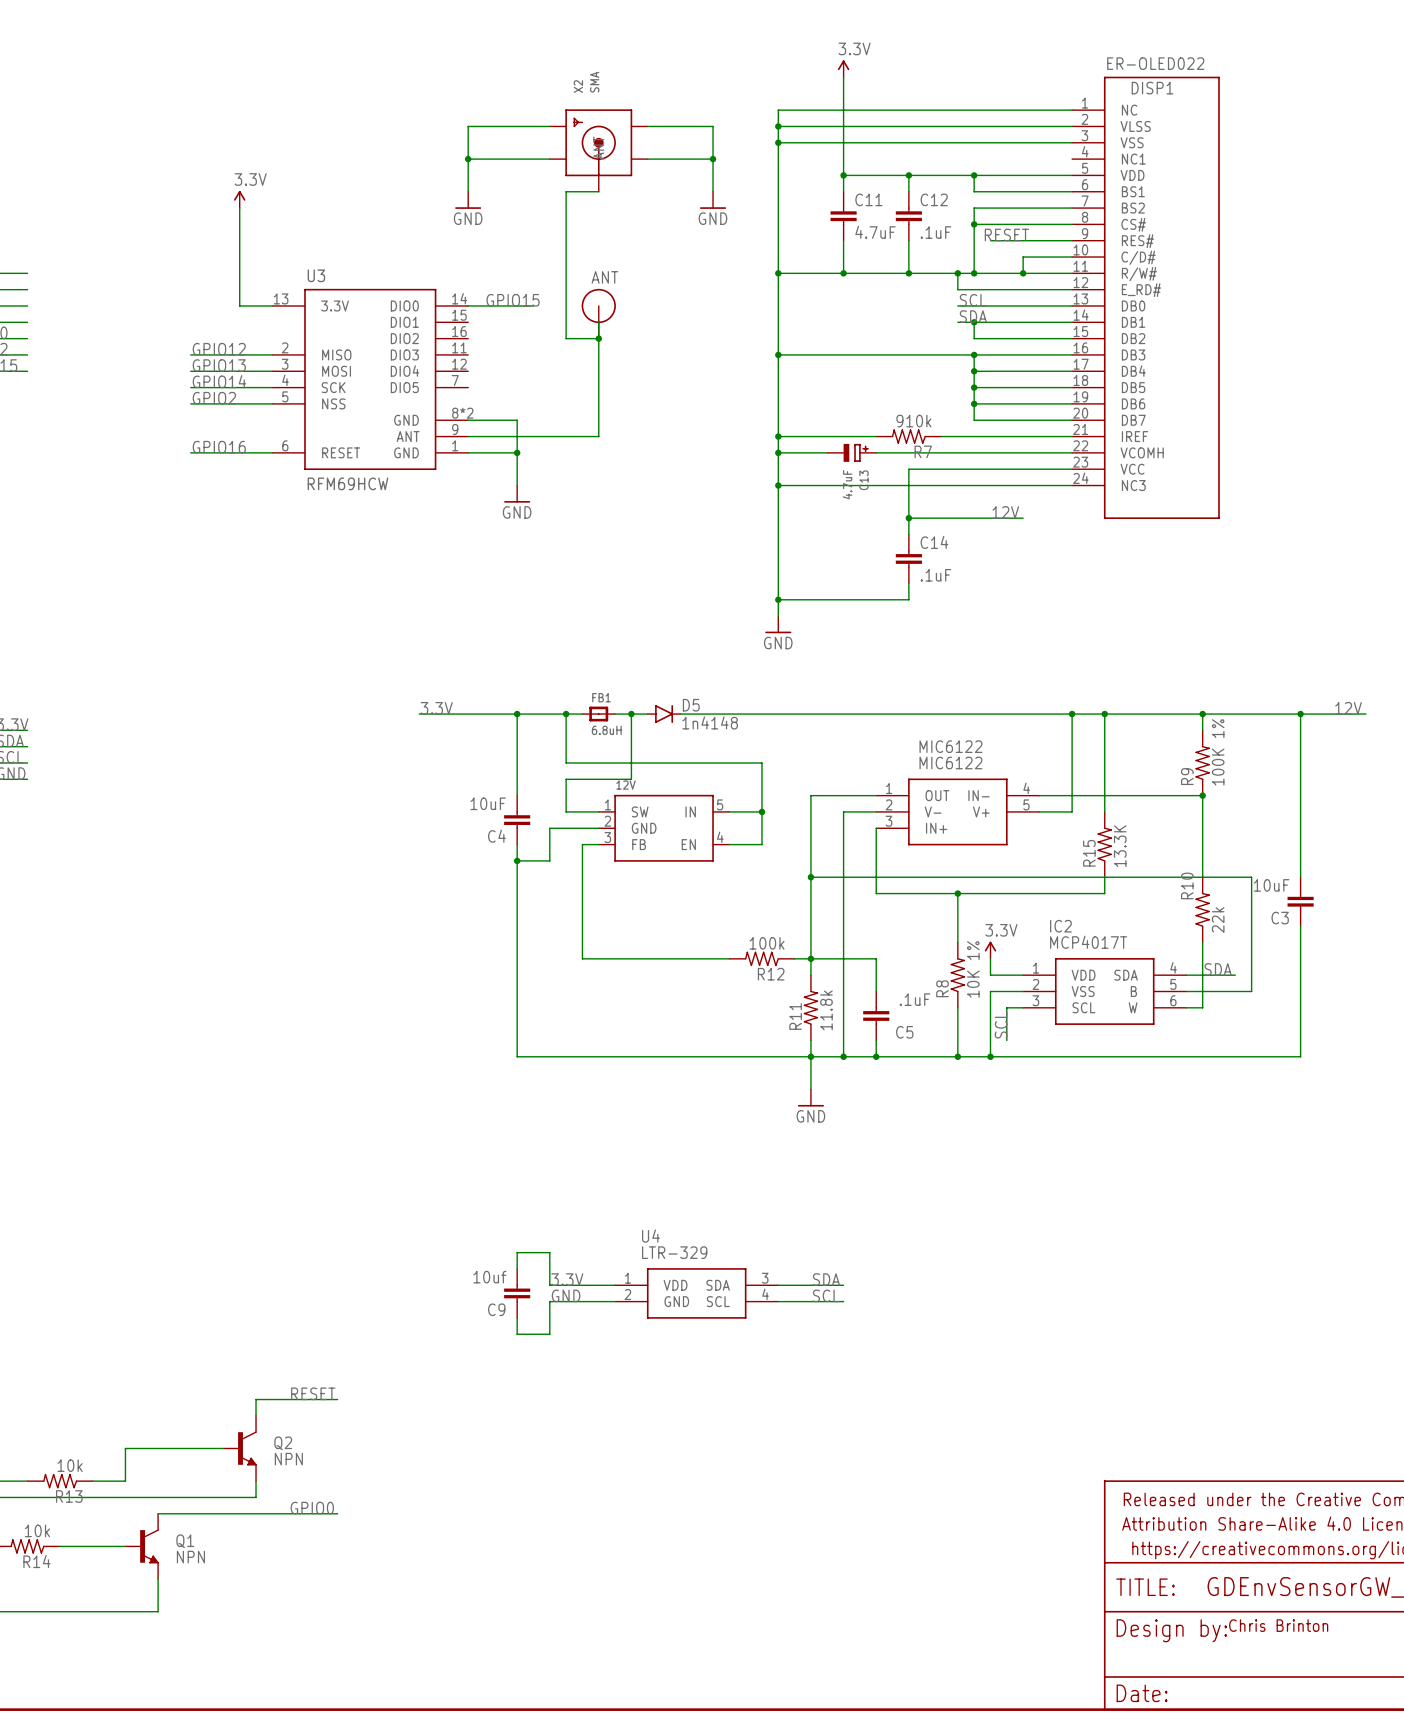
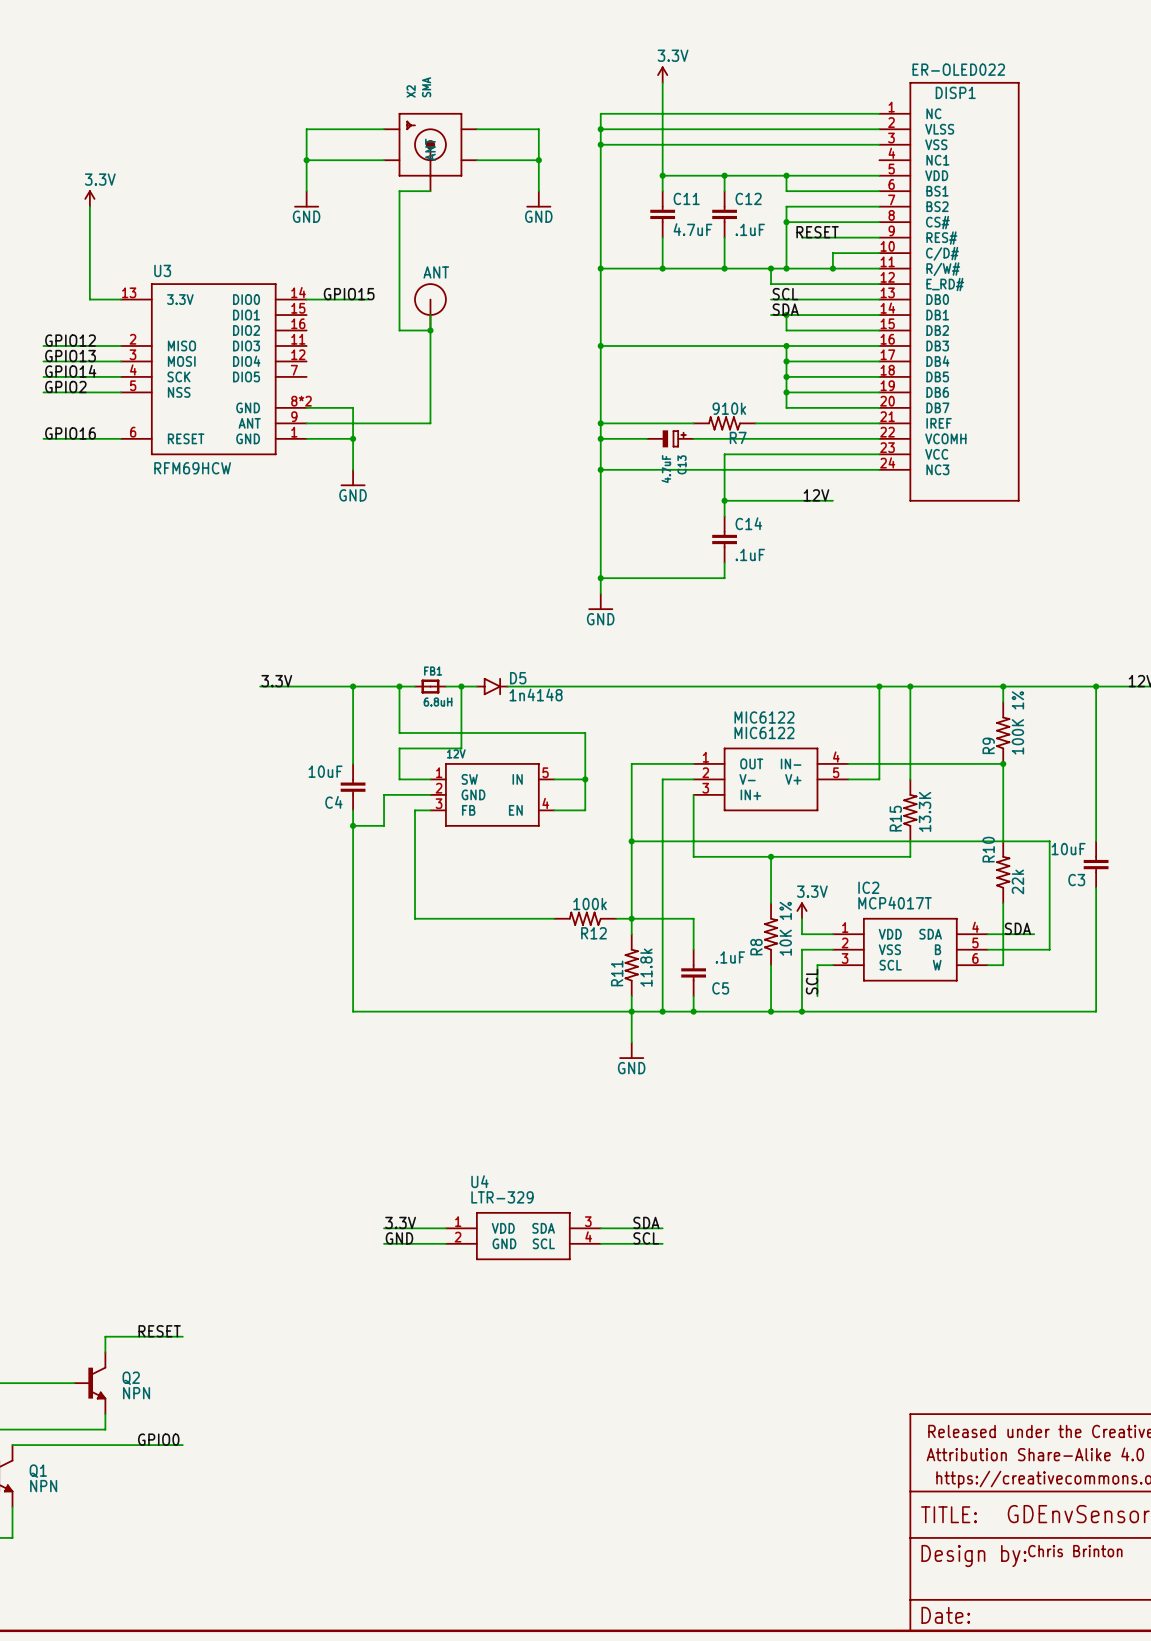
wire: (517, 1268) (517, 1252) (549, 1252) (549, 1285) -> none
C9: 10uf (517, 1293) -> none
wire: (549, 1301) (549, 1334) (517, 1334) (517, 1317) -> none

